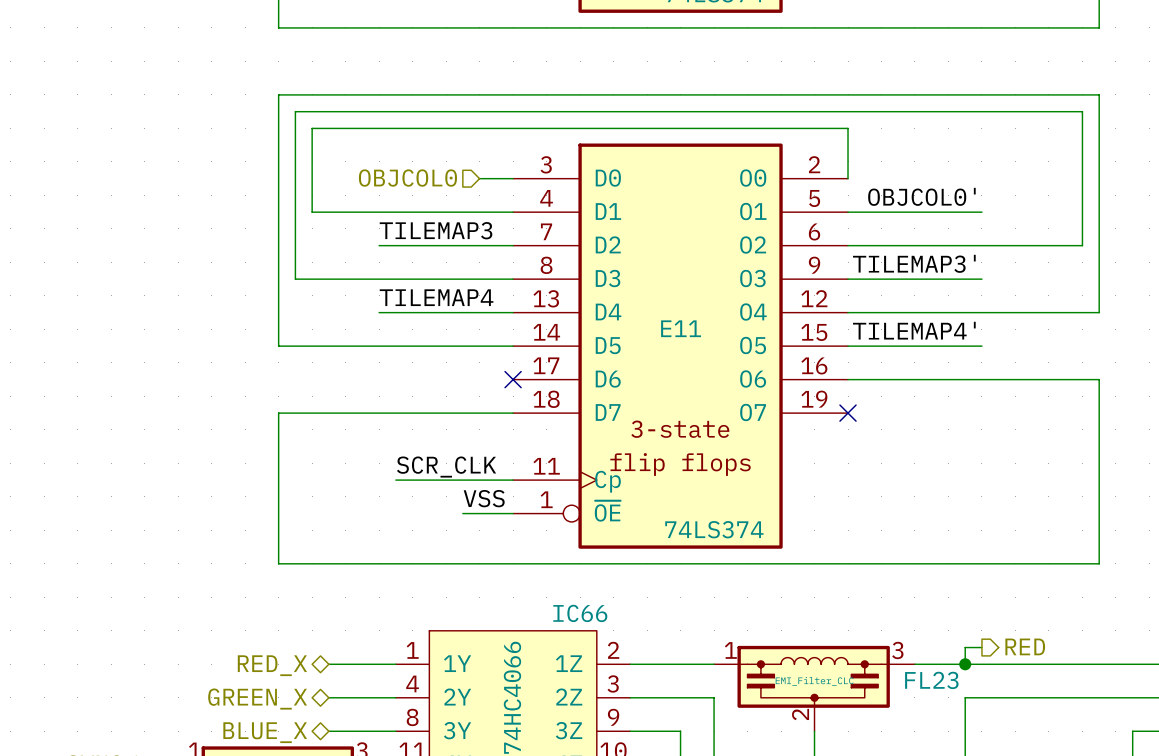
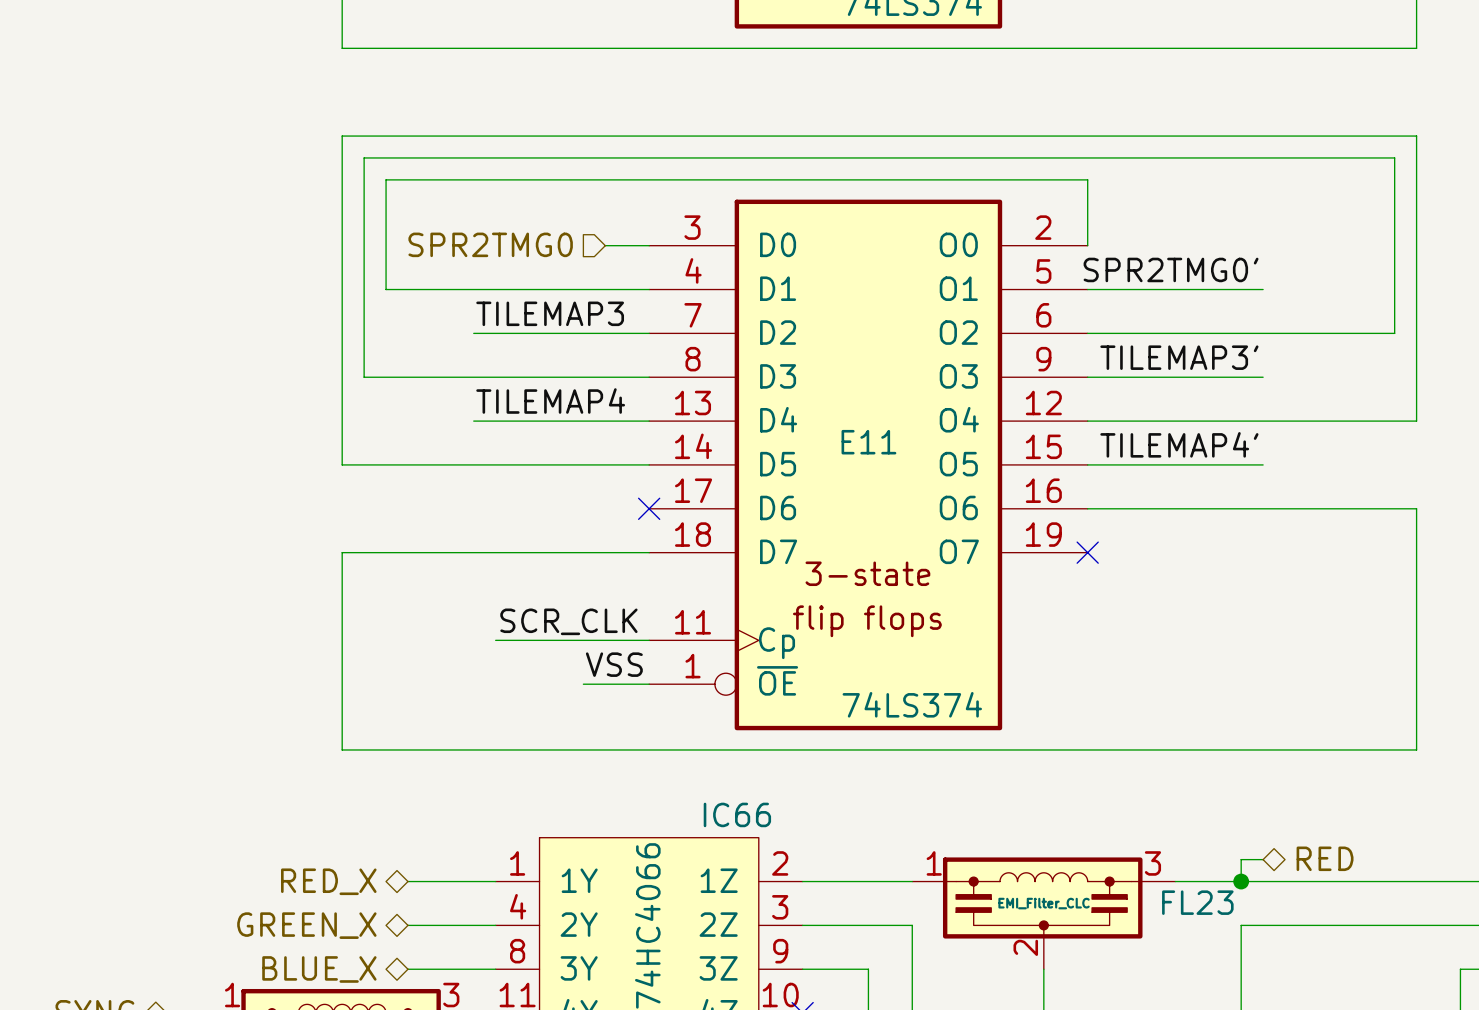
hierarchical label: OBJCOL0 (407, 178) -> SPR2TMG0 (490, 244)
label: OBJCOL0' (921, 196) -> SPR2TMG0' (1171, 269)
hierarchical label shape: output (1025, 646) -> bidirectional (1325, 858)

